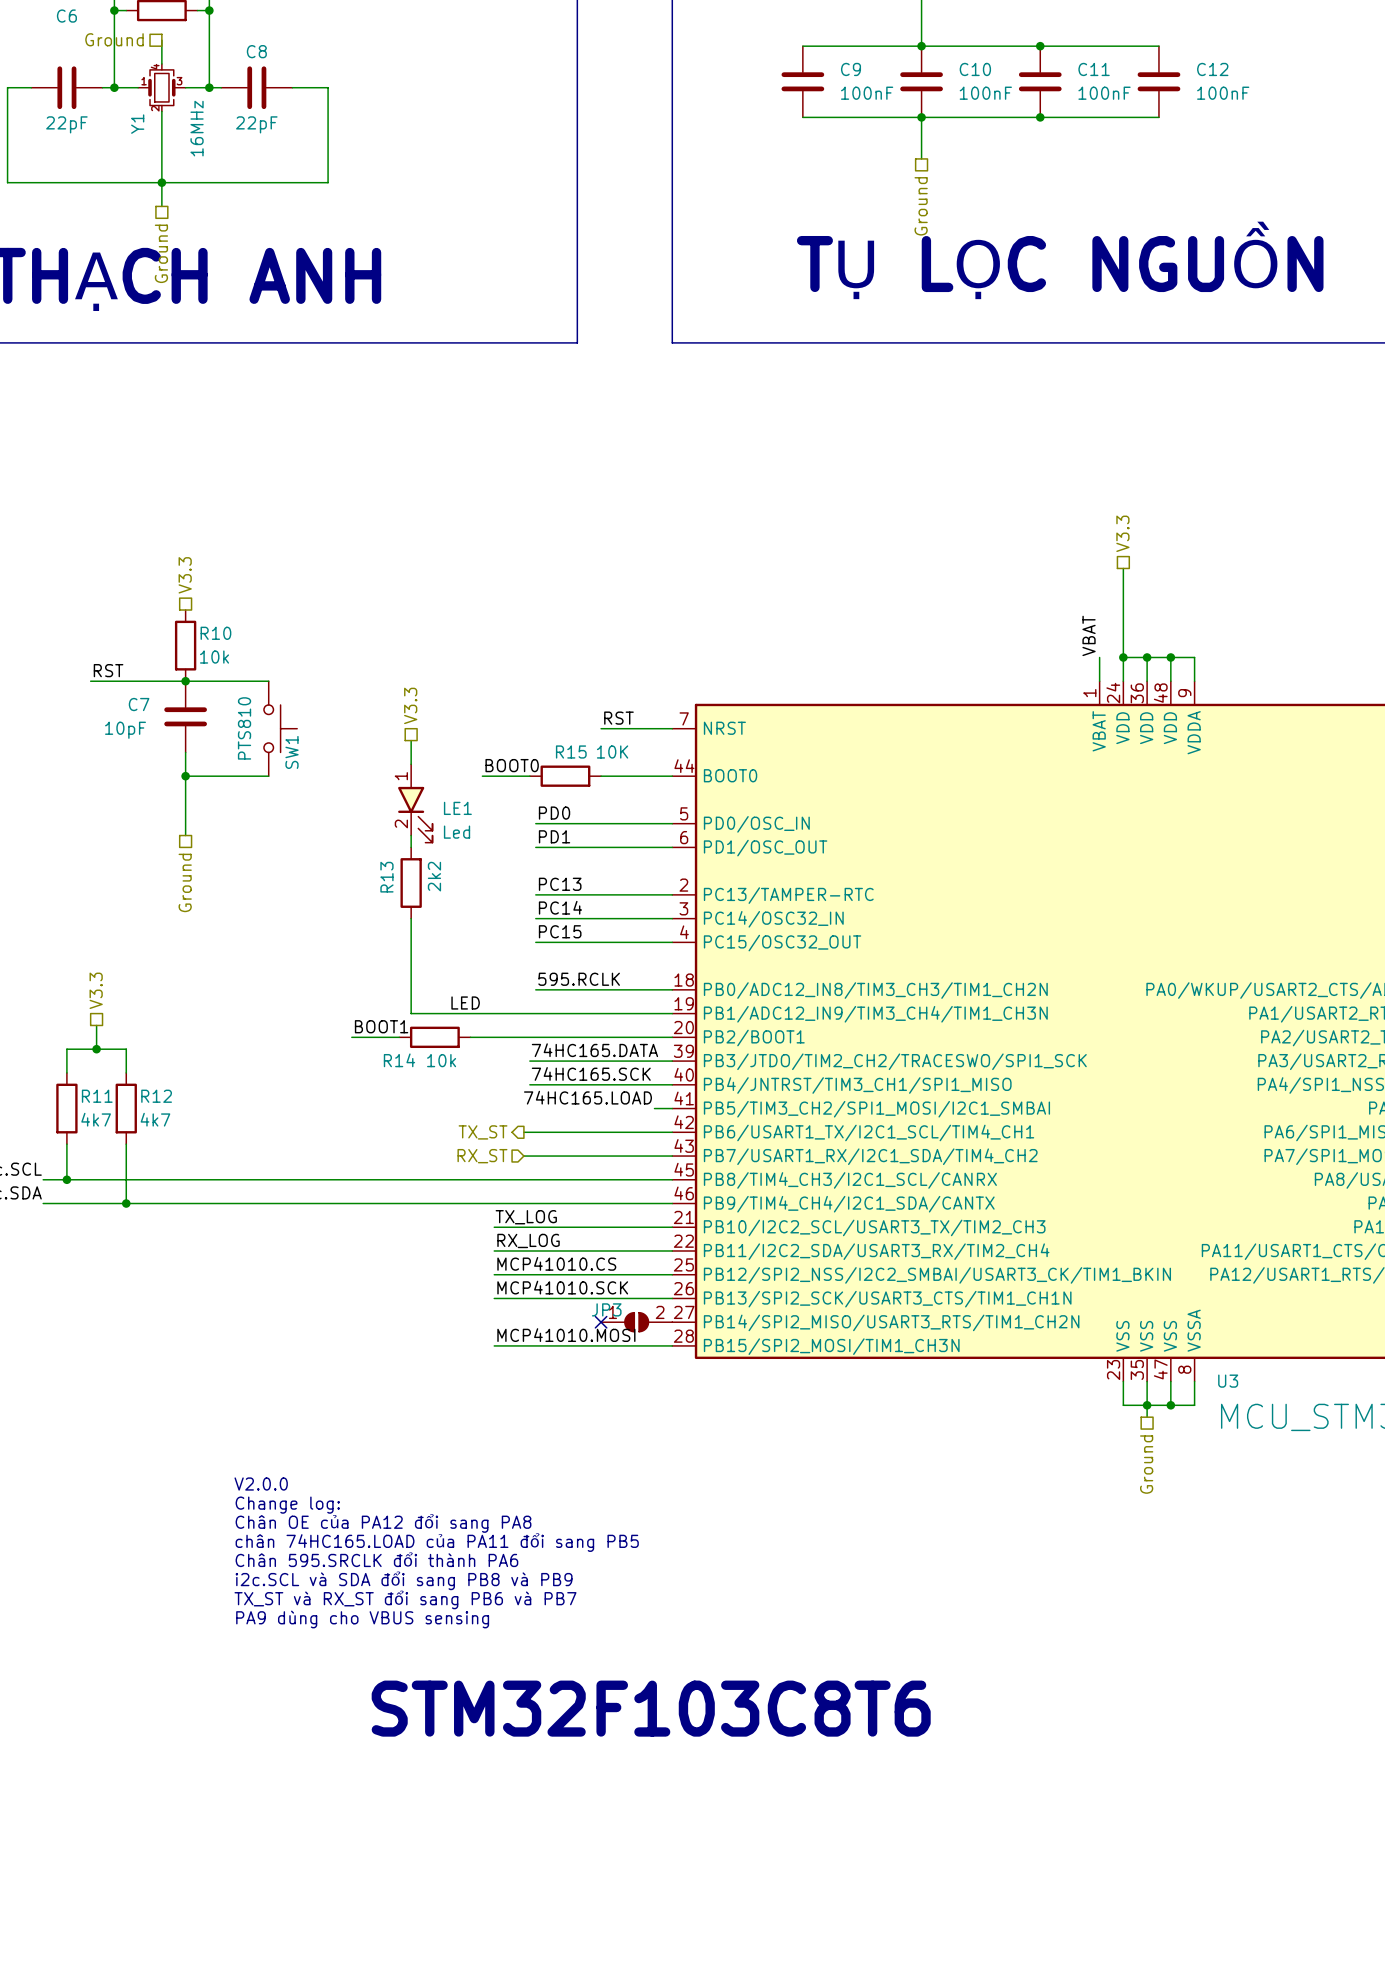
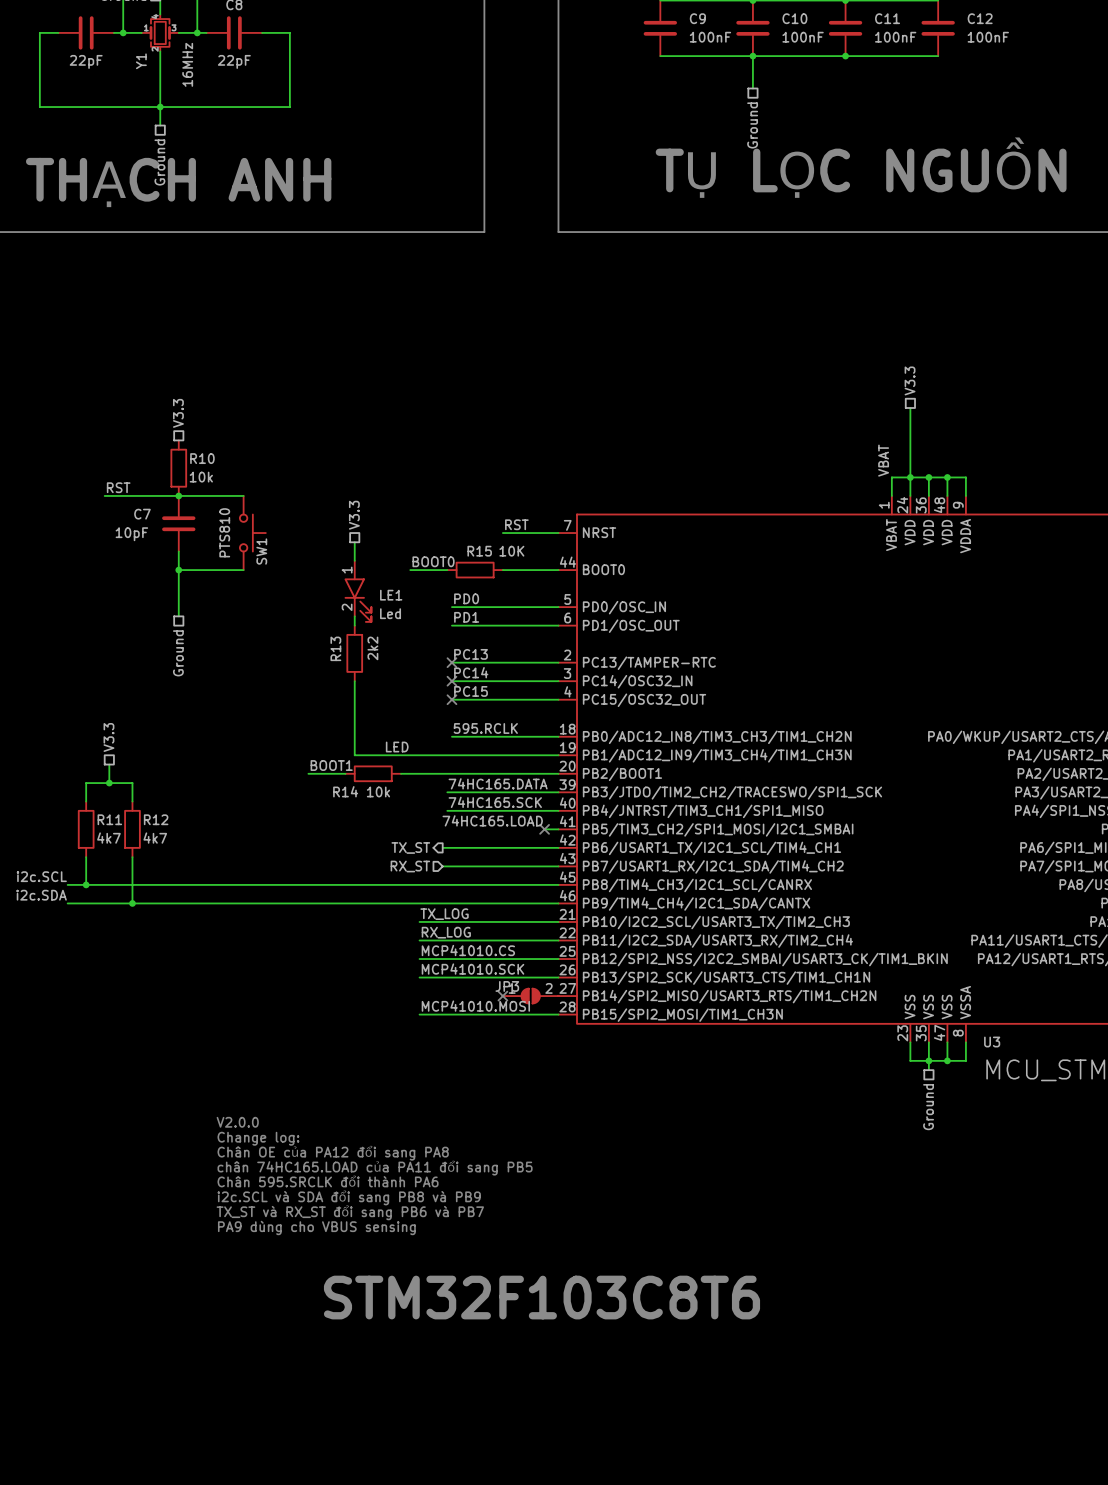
wire: none -> (891, 477) (910, 477)
no-connect mark: none -> (451, 662)
no-connect mark: none -> (451, 681)
no-connect mark: none -> (451, 699)
no-connect mark: none -> (544, 829)

